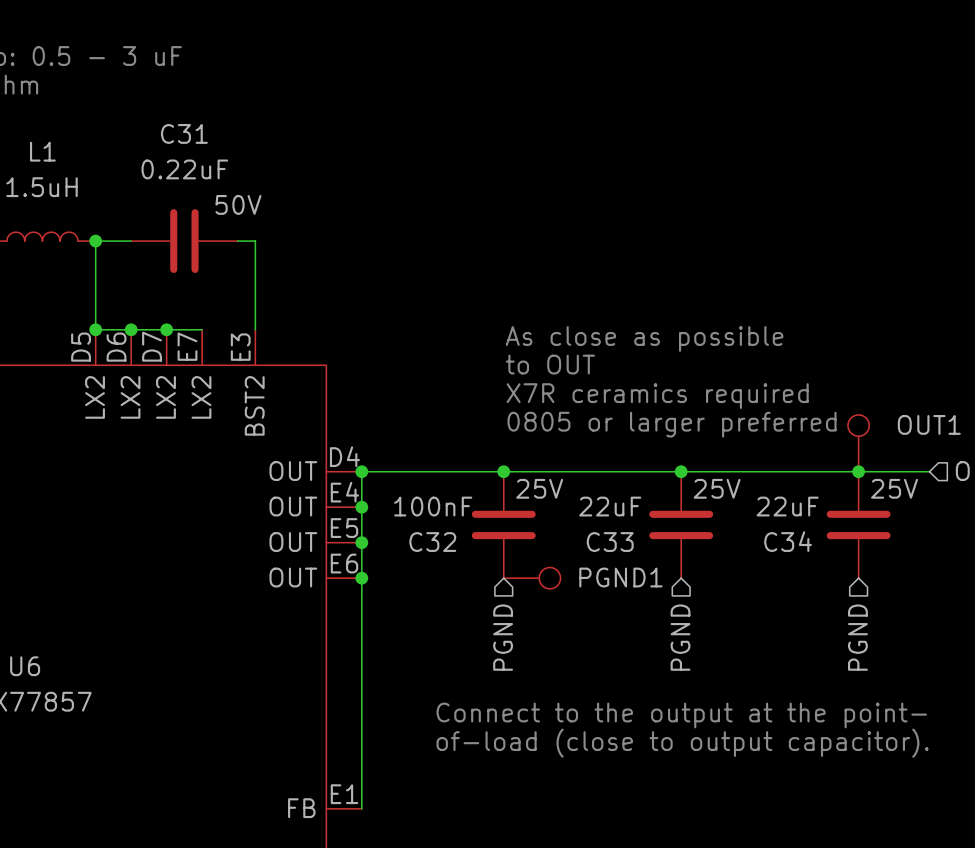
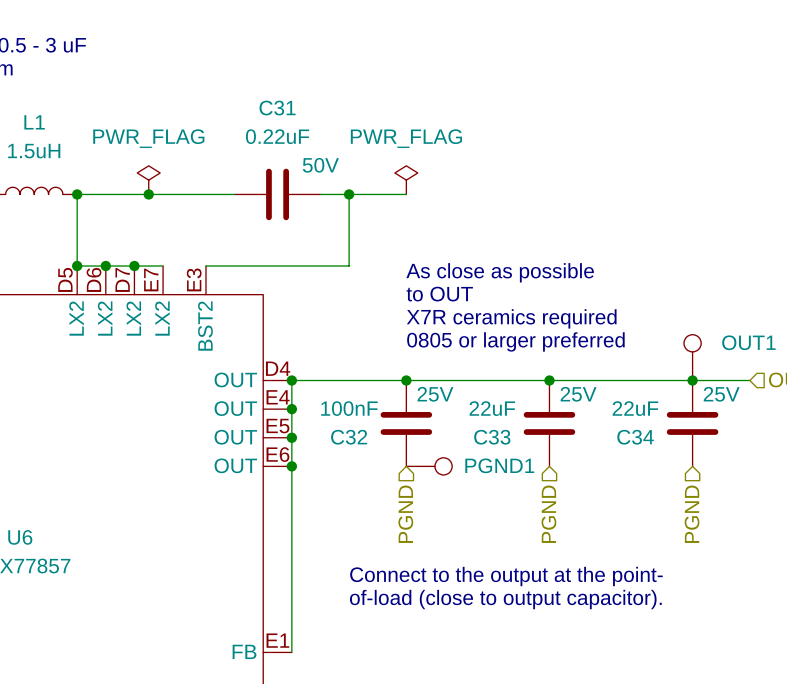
power symbol: none -> PWR_FLAG (148, 180)
power symbol: none -> PWR_FLAG (406, 180)
C31 position: (184, 241) -> (277, 194)
junction: none -> (148, 194)
wire: (255, 241) (255, 329) -> (205, 194) (234, 194)
wire: none -> (320, 194) (406, 194)
wire: none -> (349, 194) (349, 266) (205, 266)
junction: none -> (349, 194)

